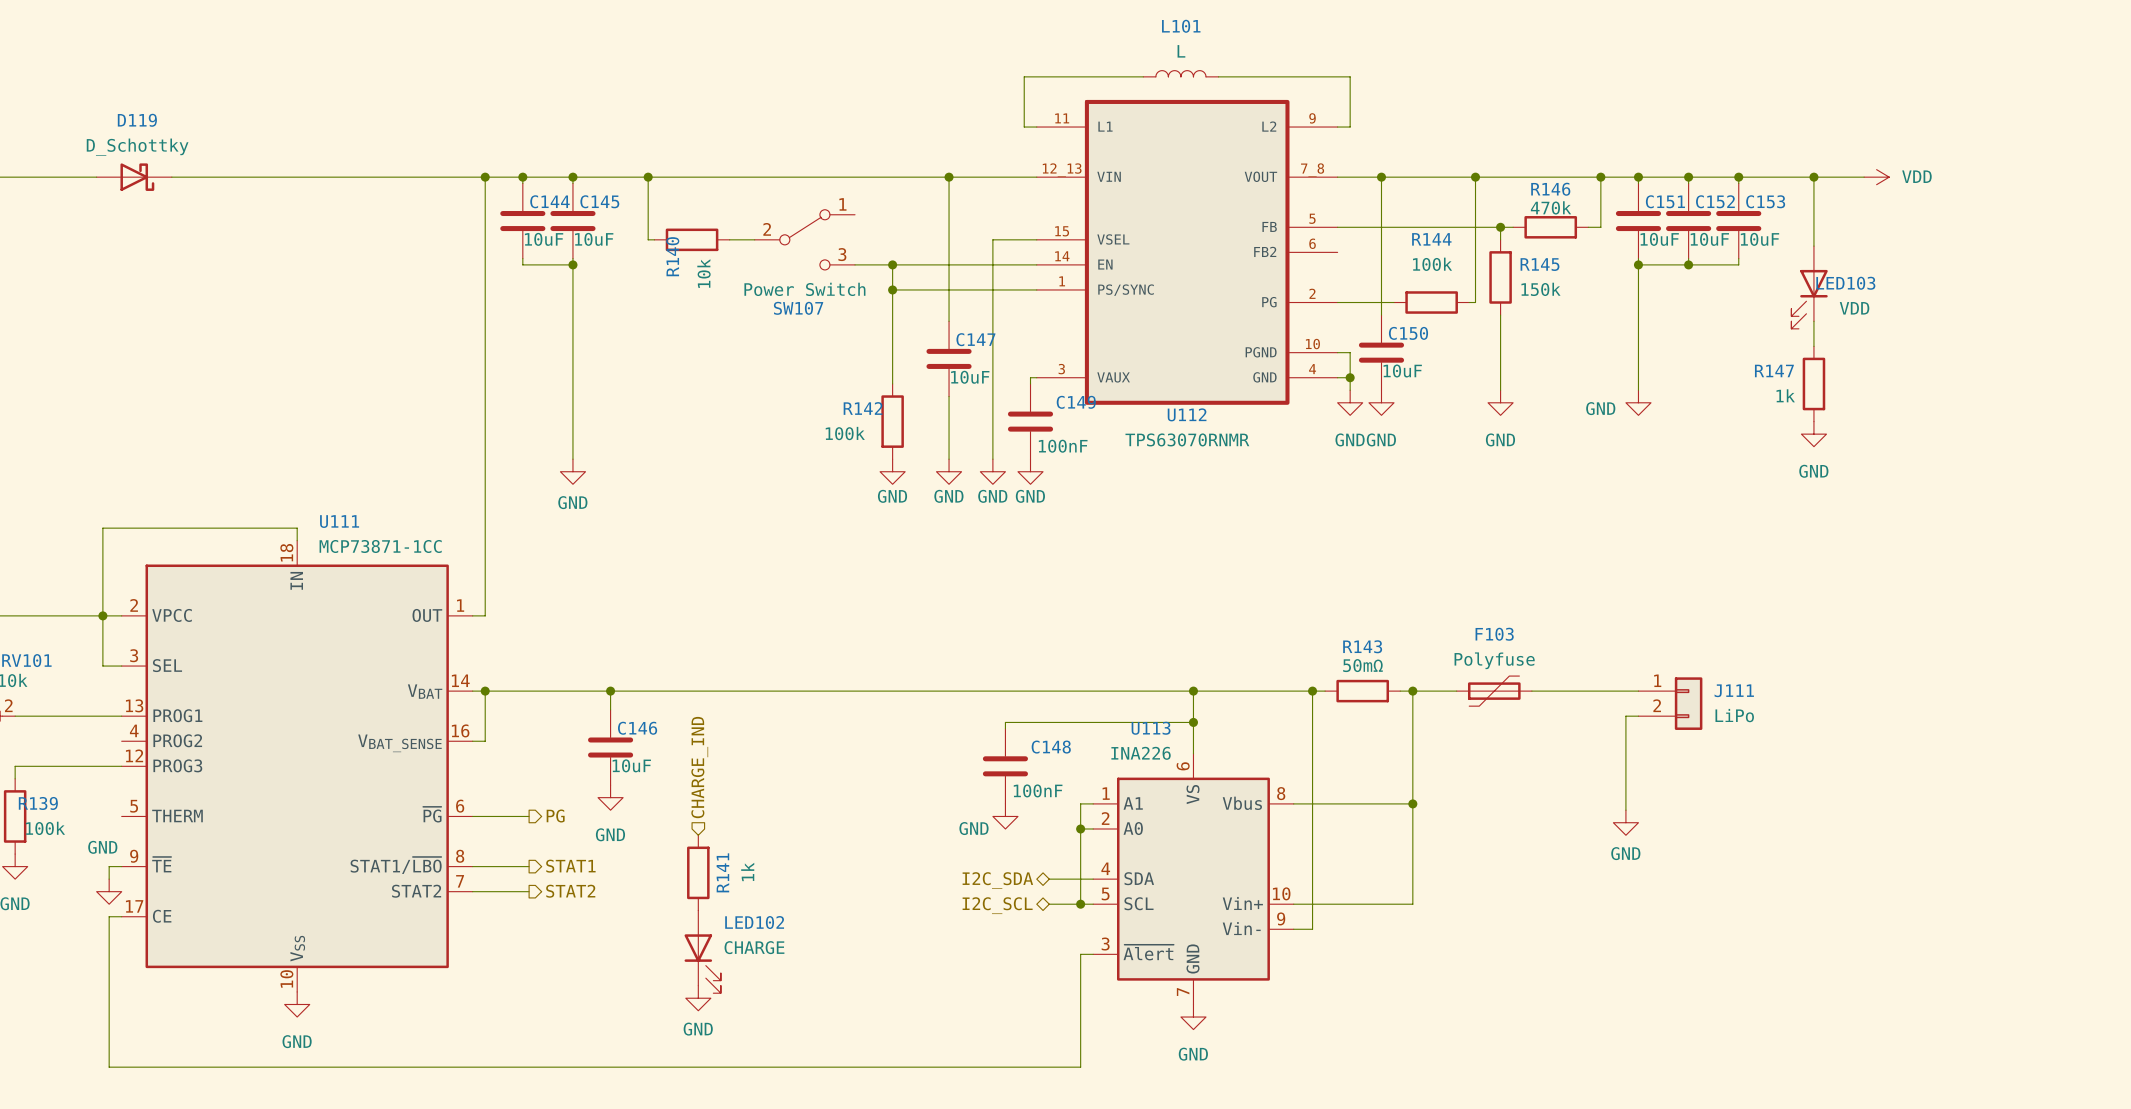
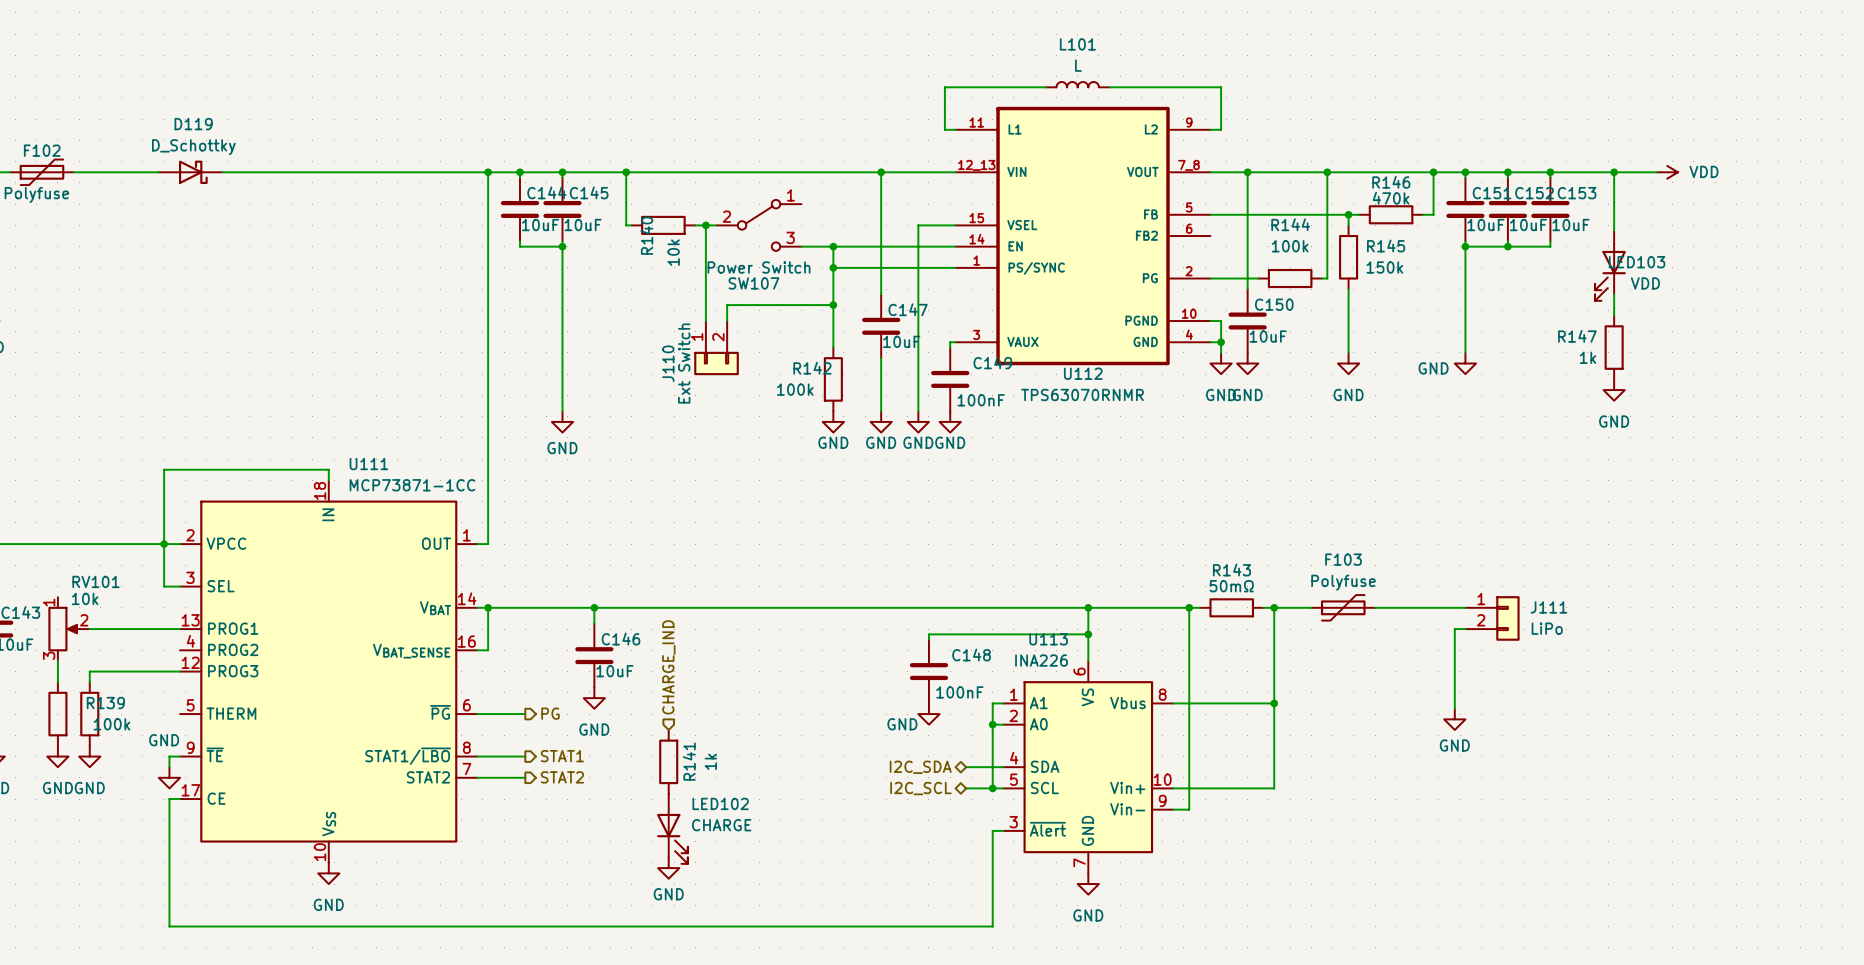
wire: none -> (705, 225) (705, 321)
junction: none -> (705, 225)
wire: none -> (833, 305) (727, 305) (727, 321)
junction: none -> (833, 305)
J110: none -> Ext Switch (716, 348)

